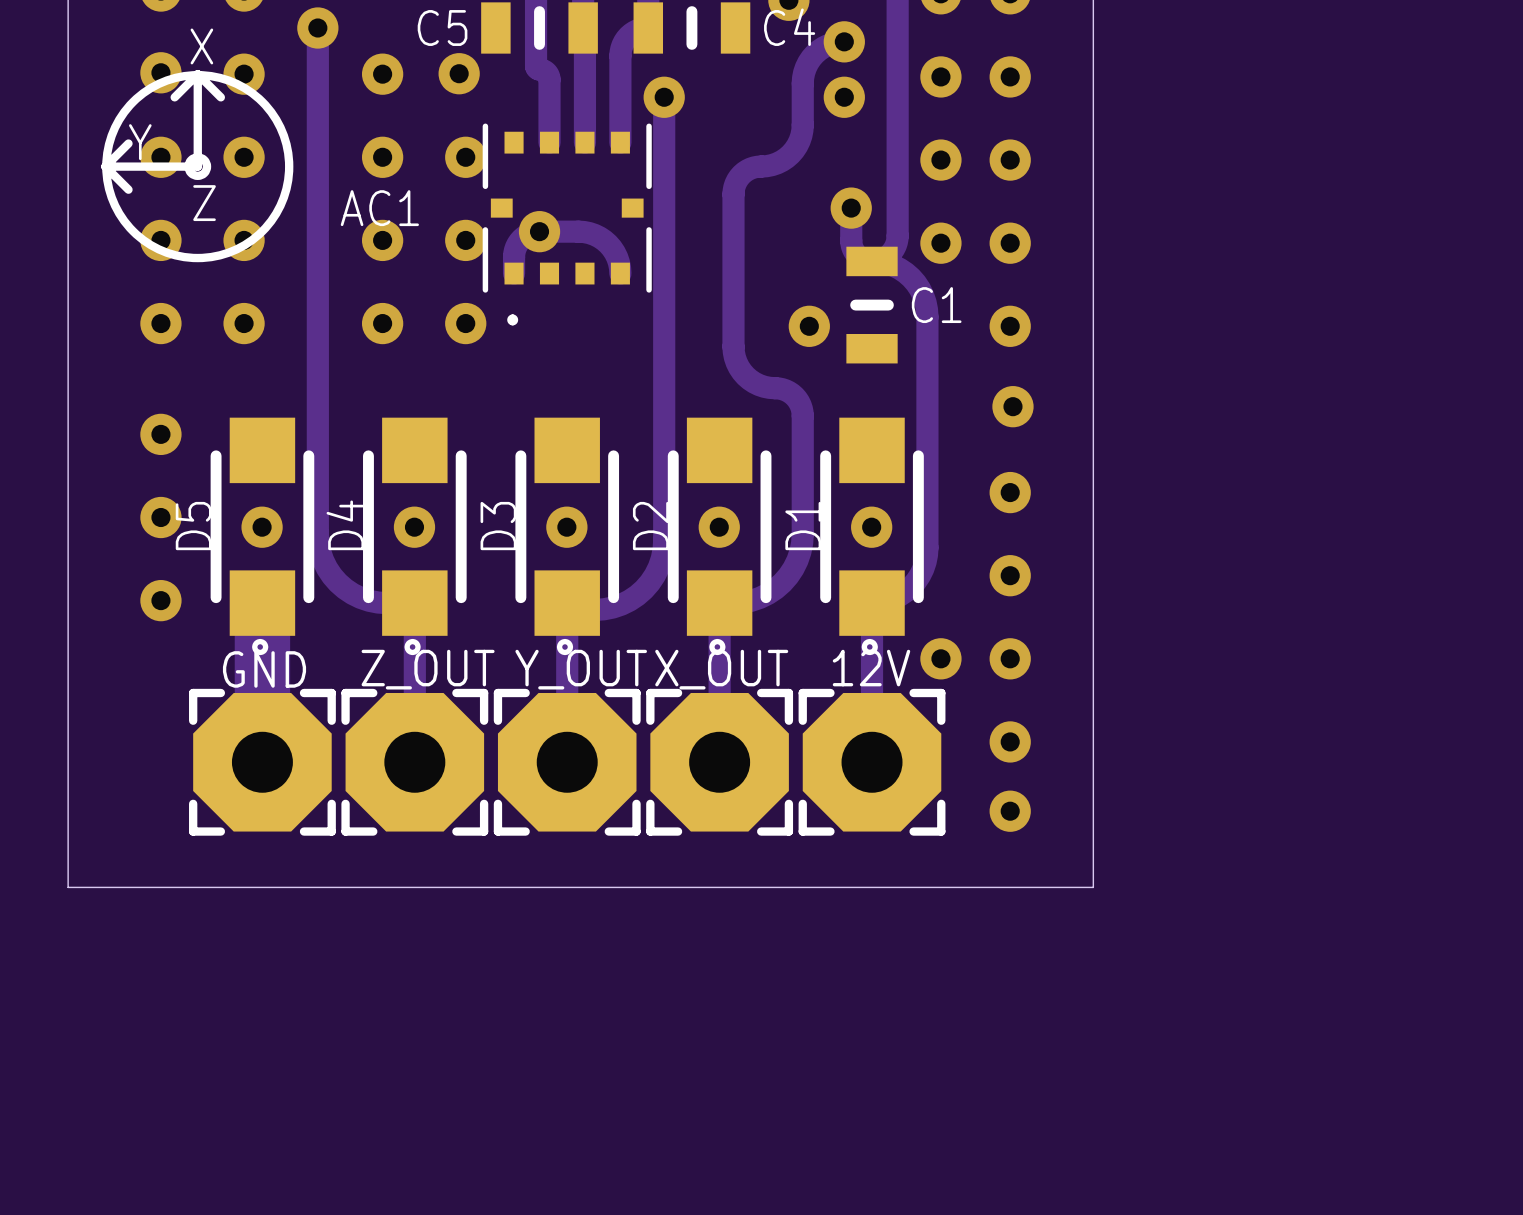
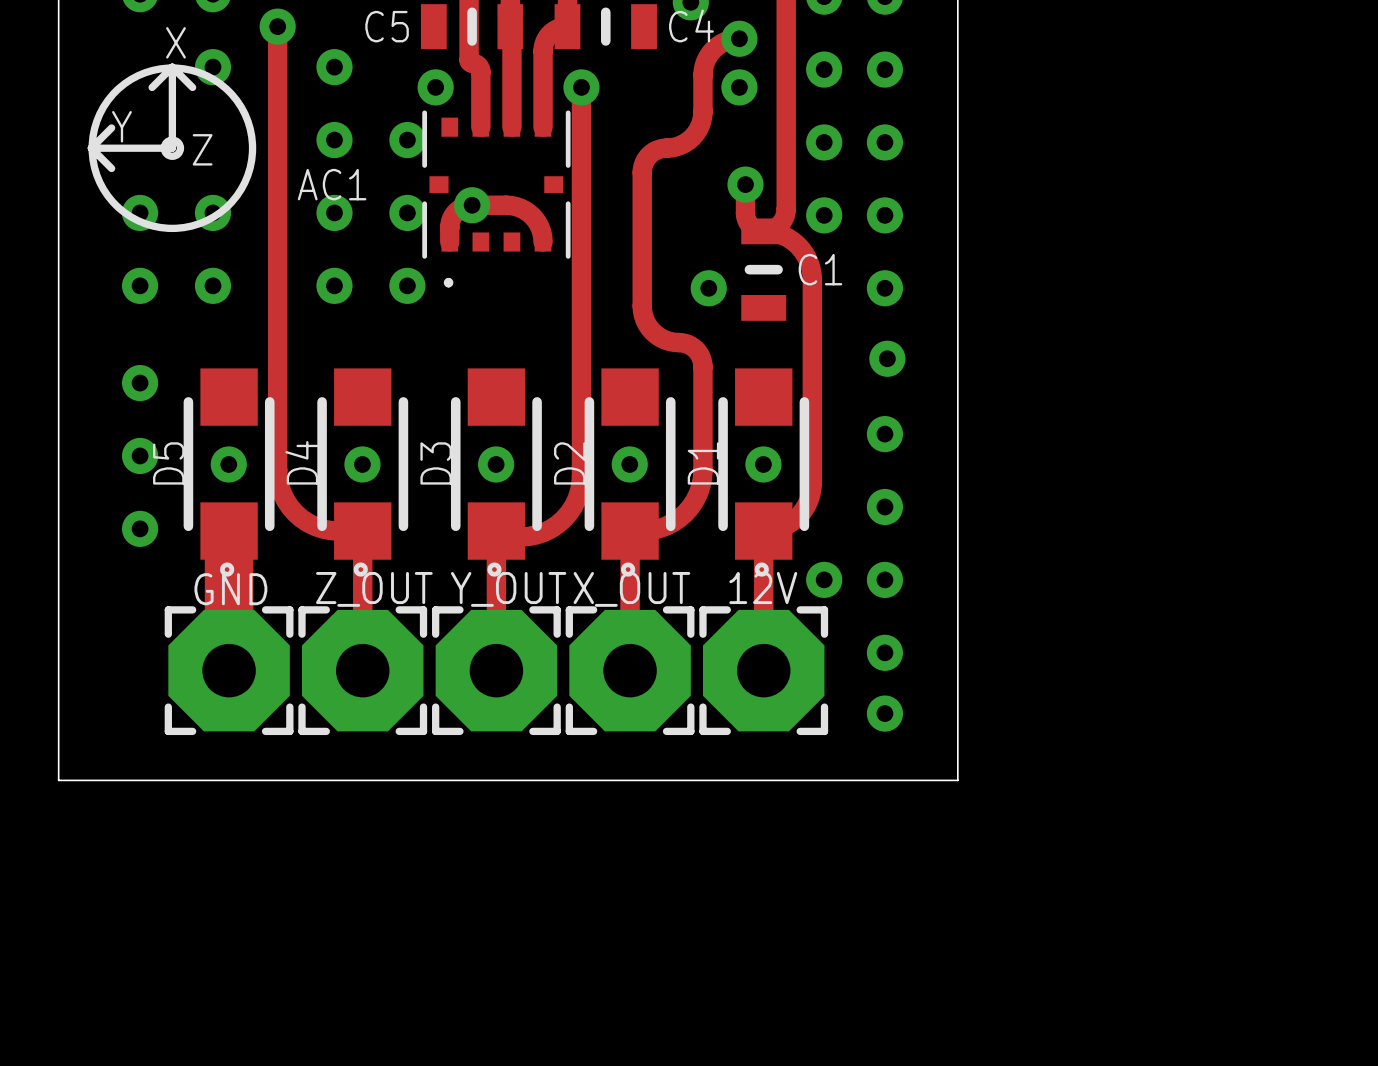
via: (160, 72) -> none
via position: (459, 73) -> (435, 87)
via: (160, 157) -> none
via: (244, 157) -> none
text position: Z (204, 203) -> Z (202, 149)

